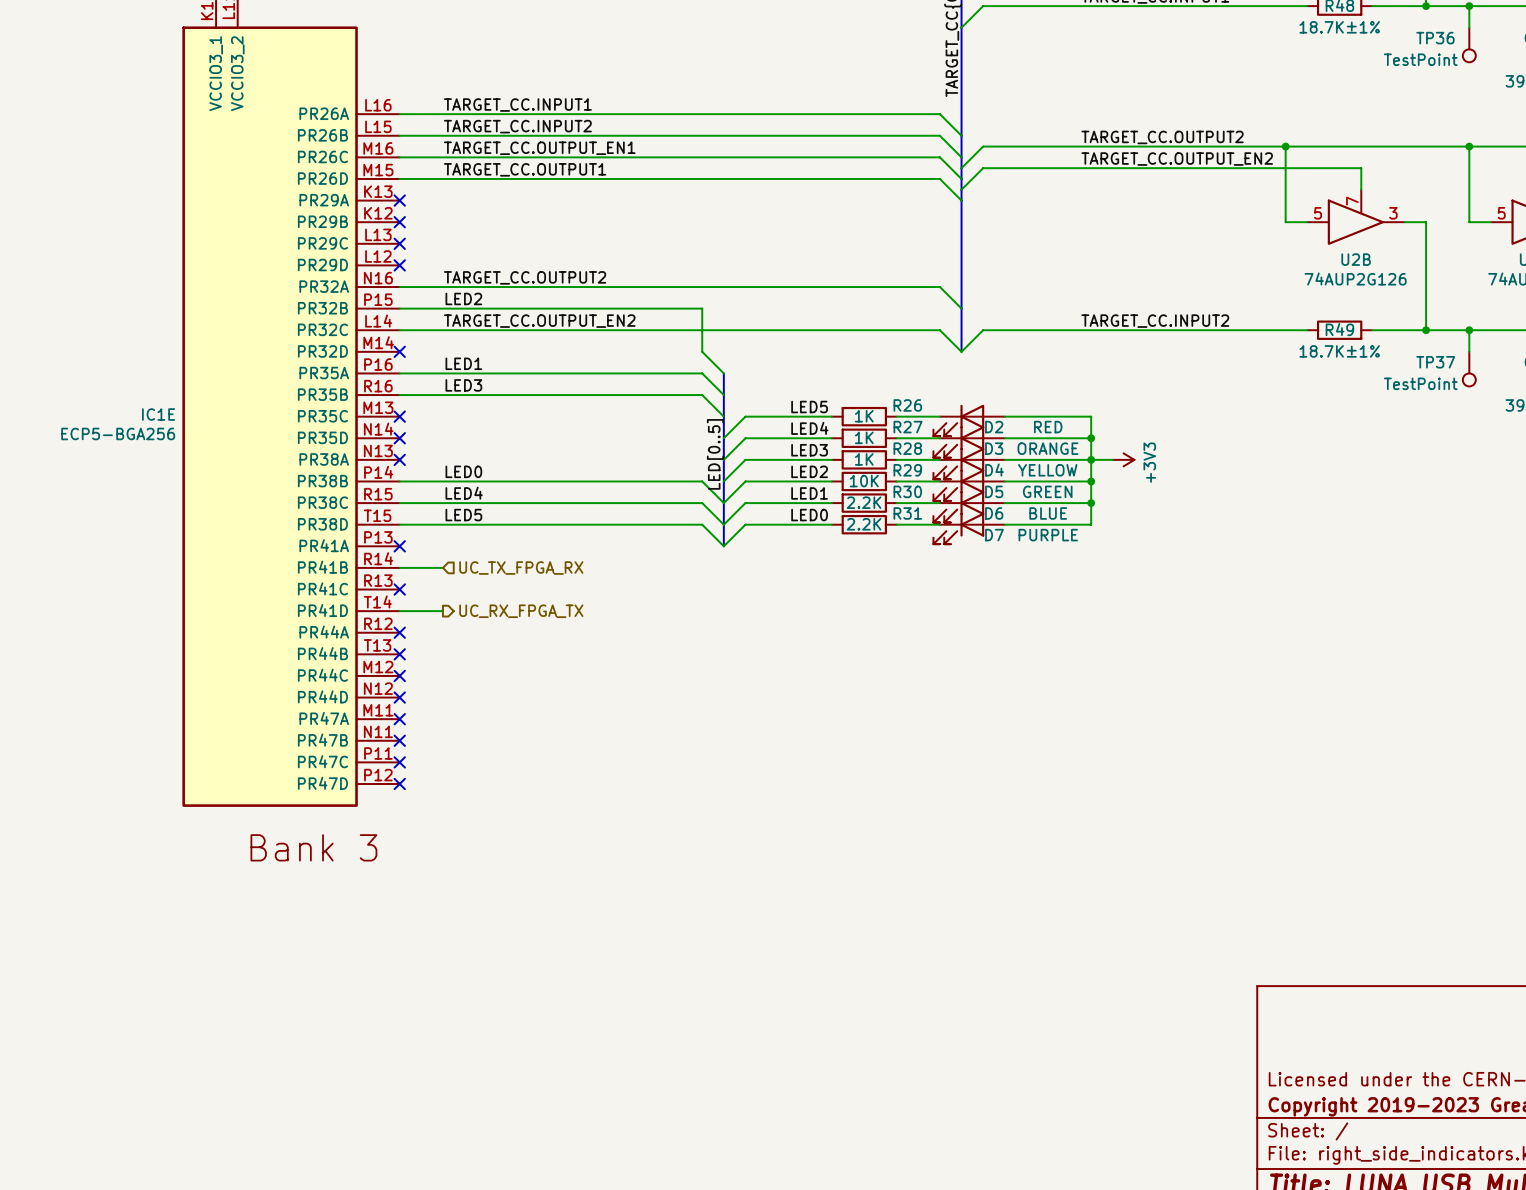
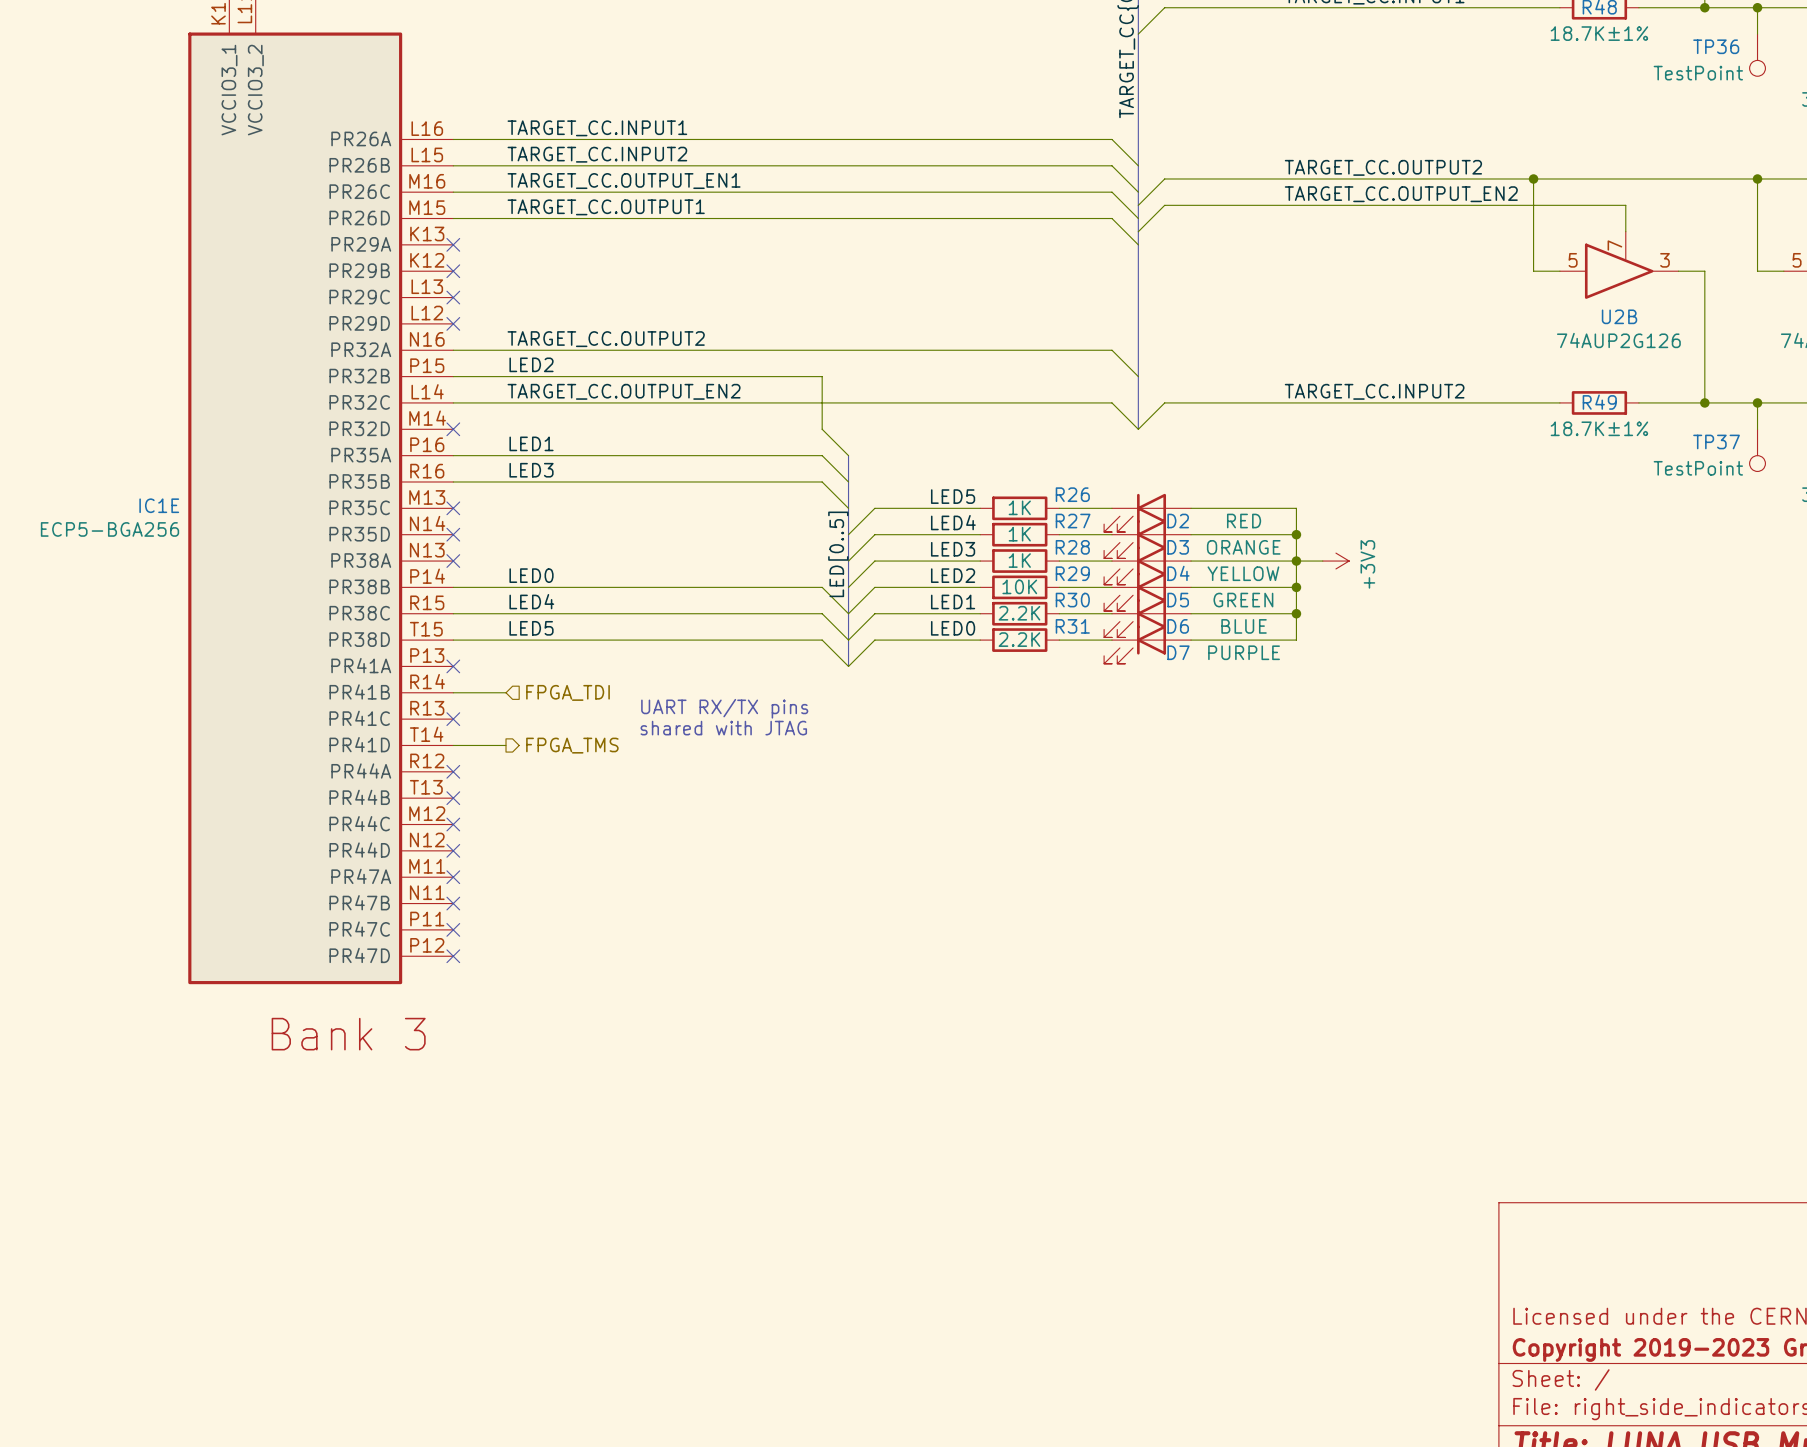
hierarchical label: UC_TX_FPGA_RX (521, 568) -> FPGA_TDI (568, 692)
text: none -> UART RX/TX pins (724, 708)
text: none -> shared with JTAG (723, 728)
hierarchical label: UC_RX_FPGA_TX (521, 611) -> FPGA_TMS (572, 745)

